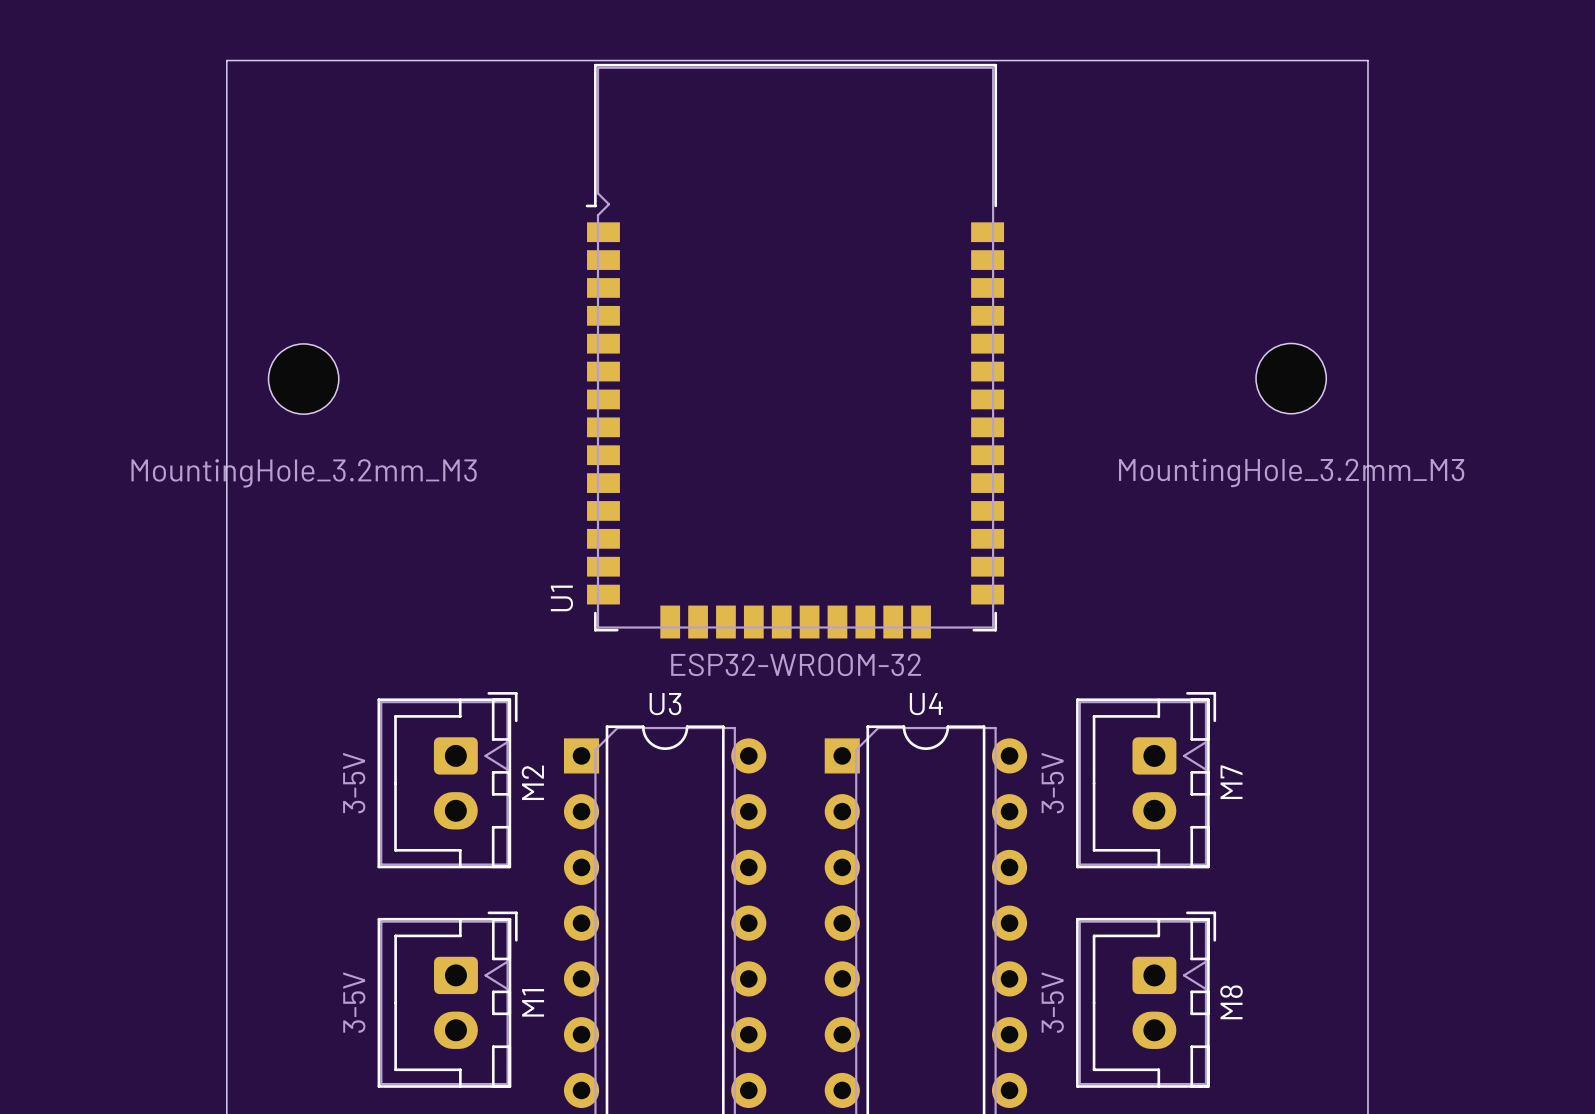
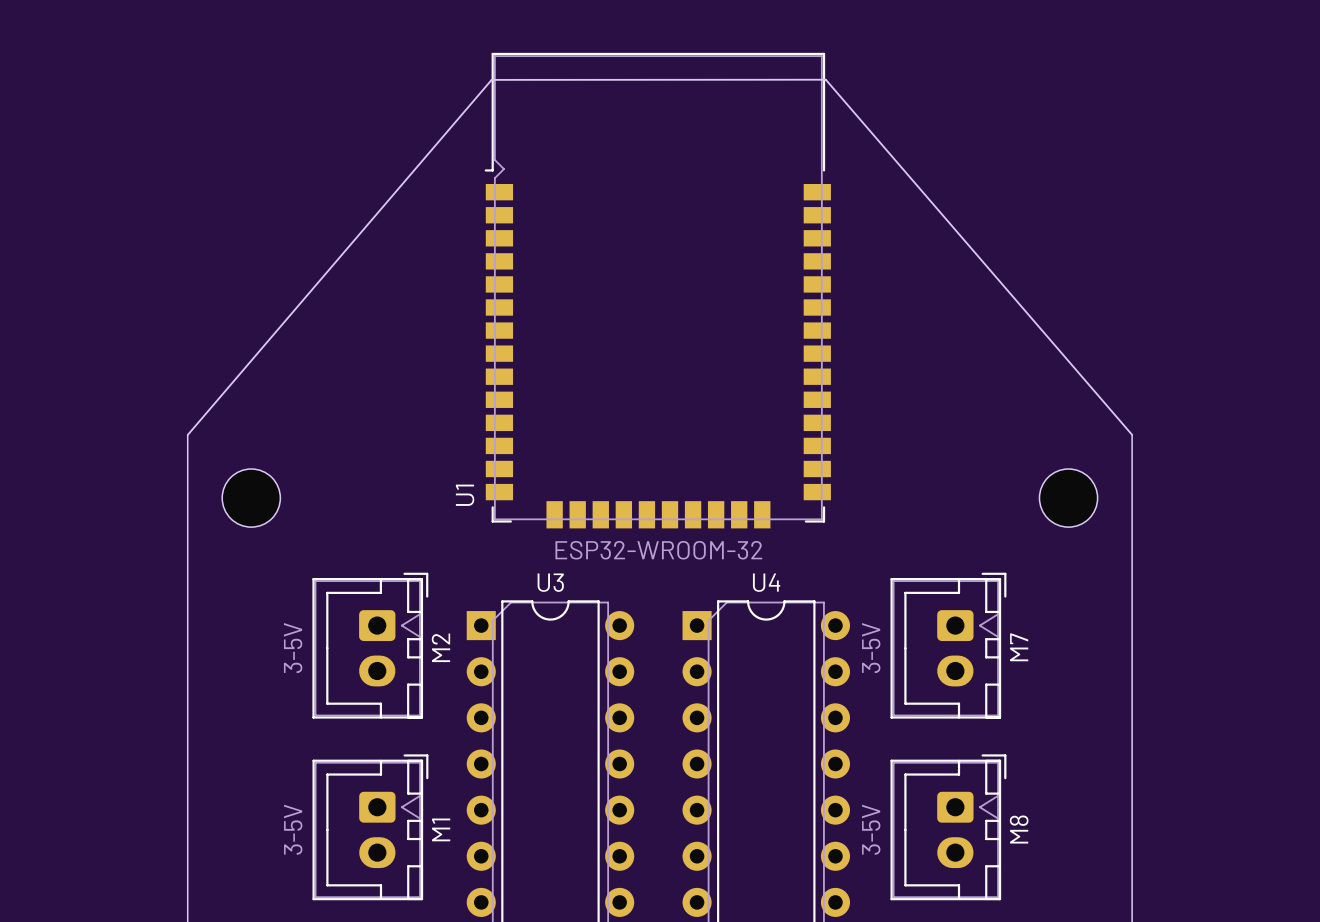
part: MountingHole_3.2mm_M3 (1291, 378) -> none
part: MountingHole_3.2mm_M3 (303, 379) -> none
board edge: (1367, 525) (1367, 60) (226, 60) (226, 525) -> (1132, 434) (825, 79) (491, 79) (187, 435)
part: none -> (251, 498)
part: none -> (1068, 498)

